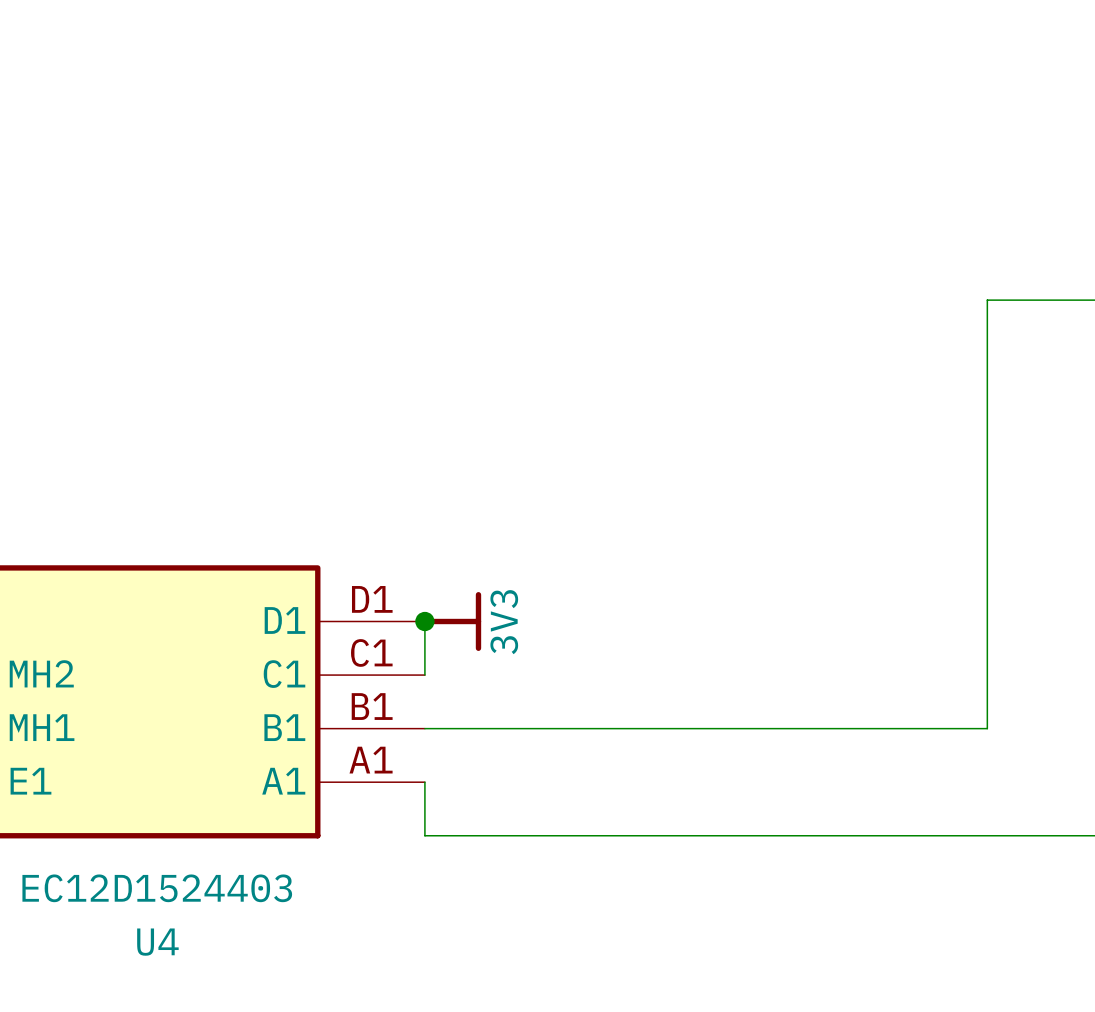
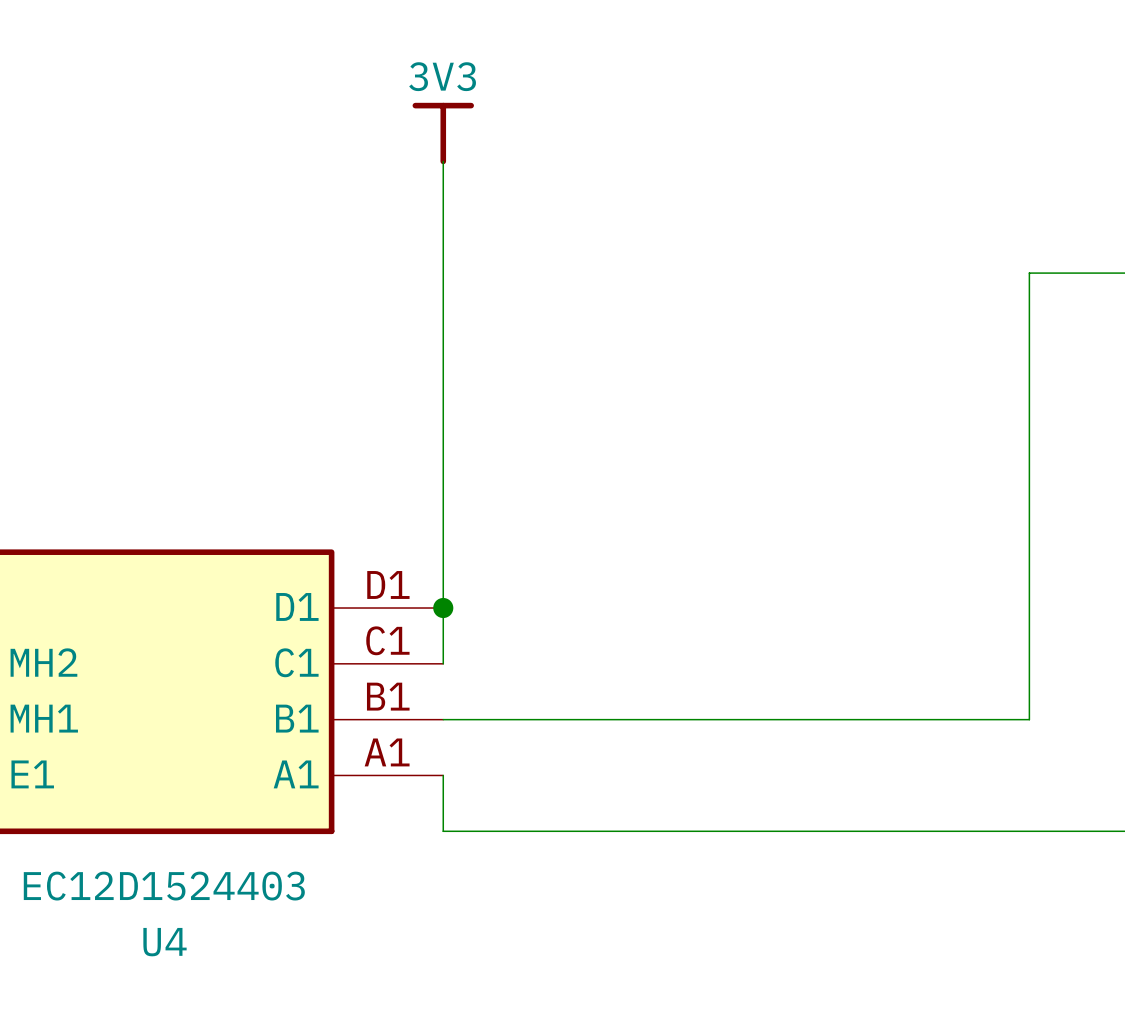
wire: none -> (443, 161) (443, 608)
power symbol rotation: 0° (451, 621) -> 90° counterclockwise (443, 133)
power symbol position: 3V3 (451, 621) -> 3V3 (443, 133)

